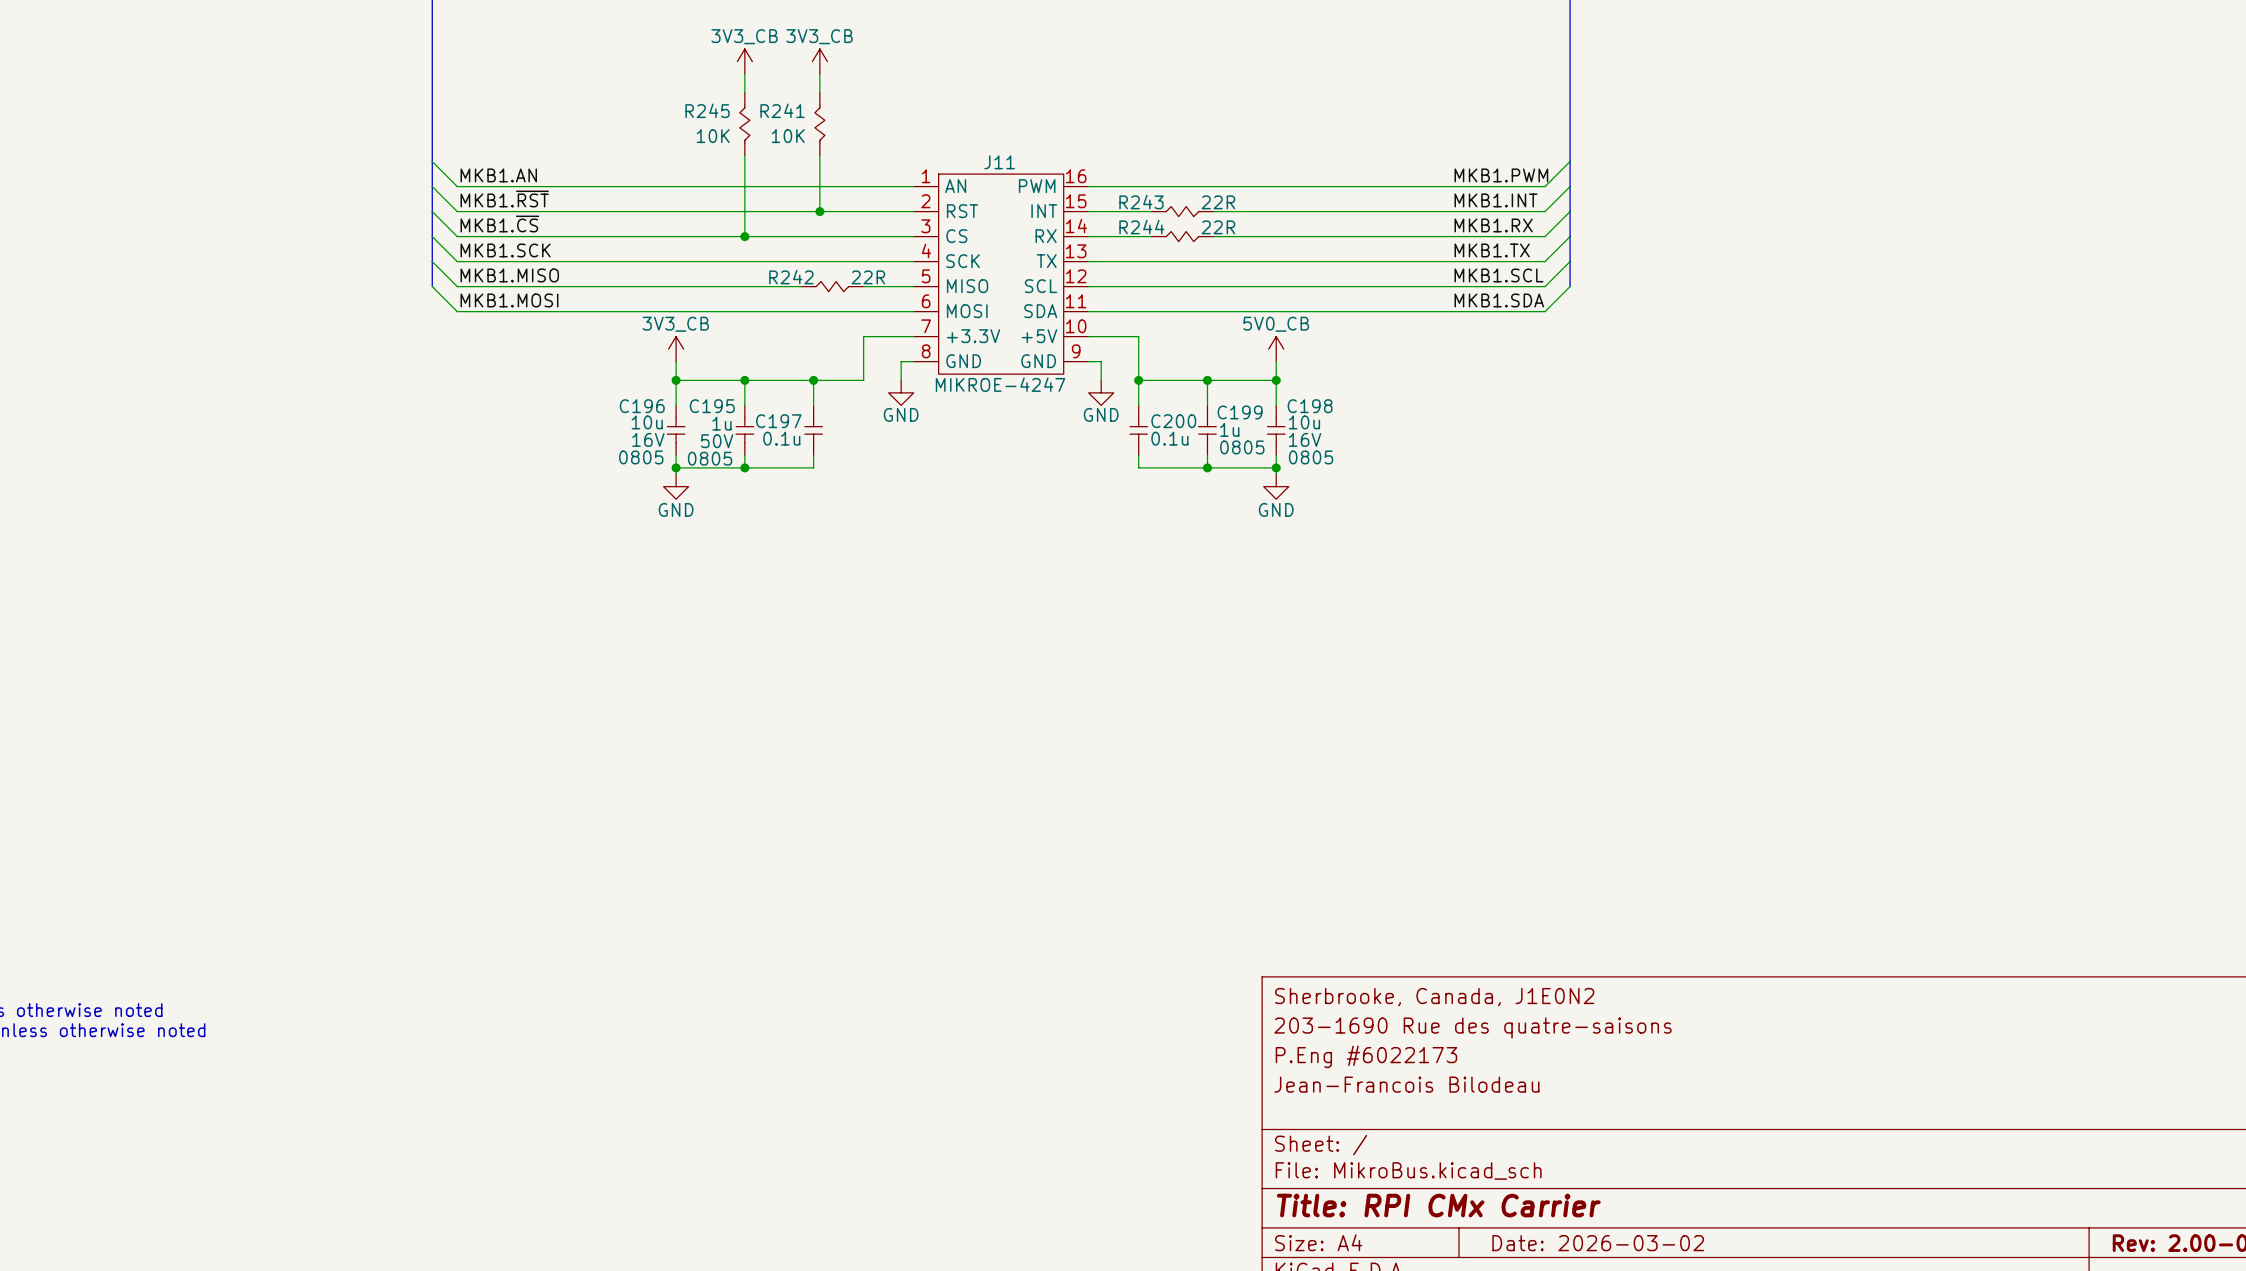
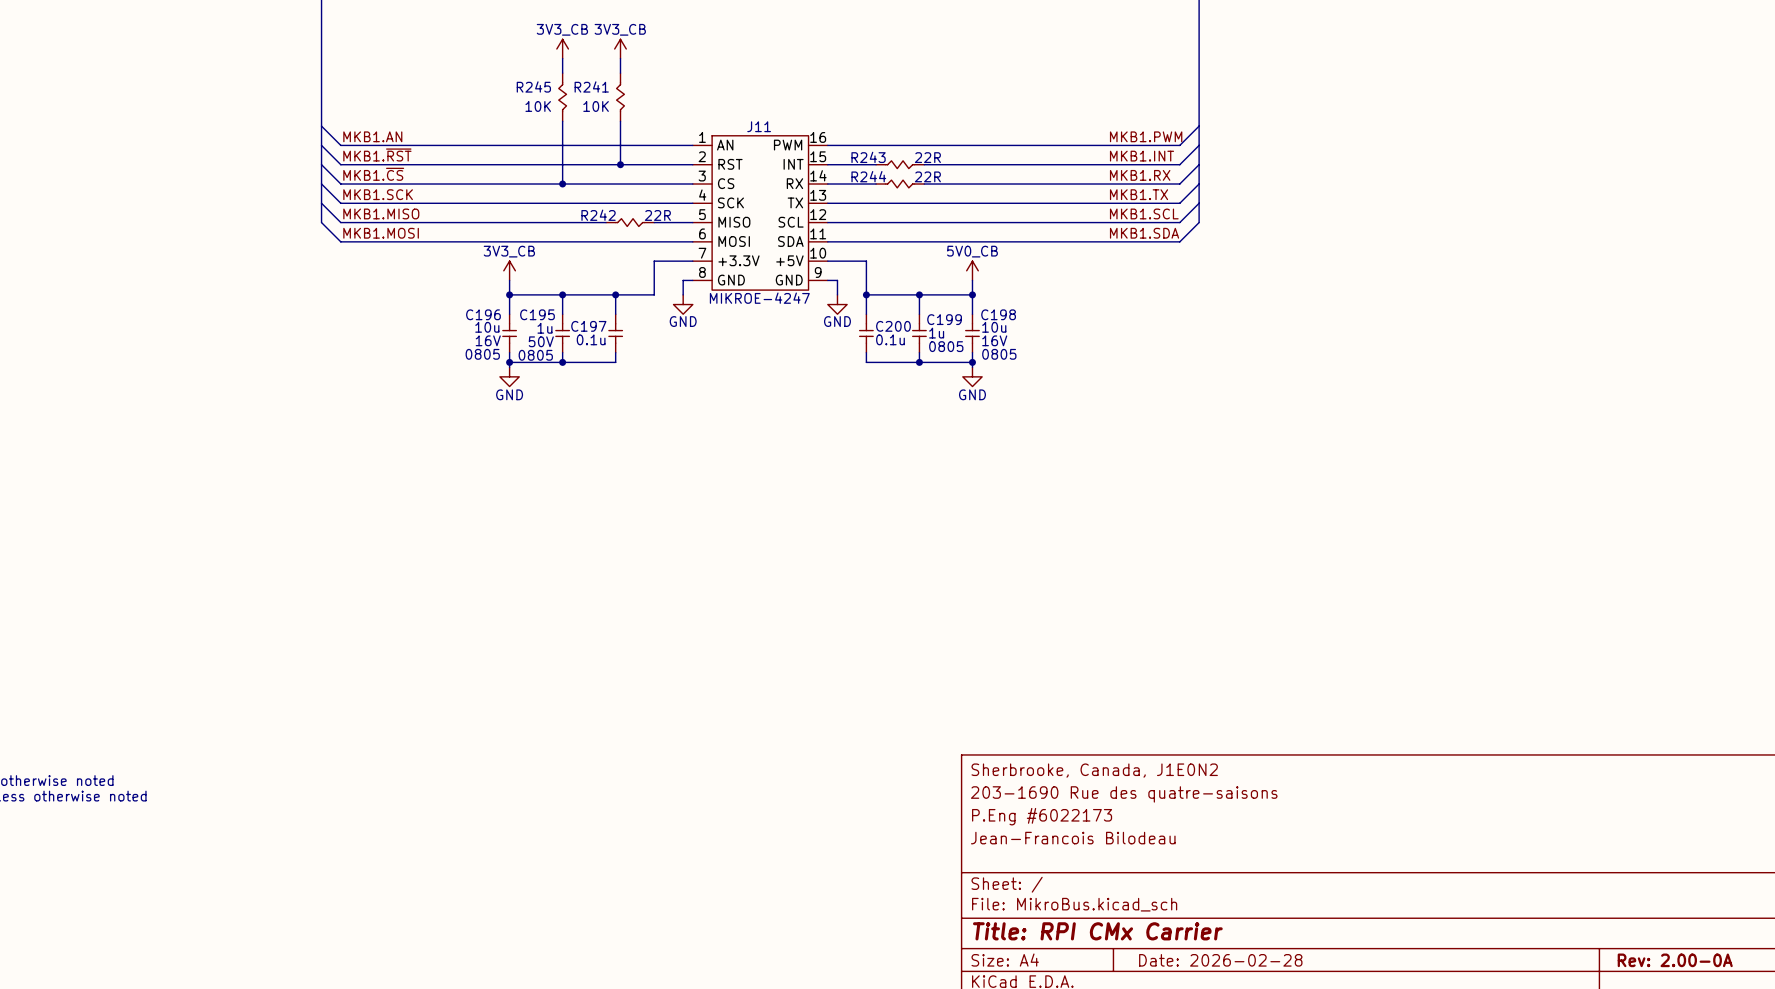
title block: Date: 2026-03-02 (1598, 1243) -> Date: 2026-02-28 (1220, 960)

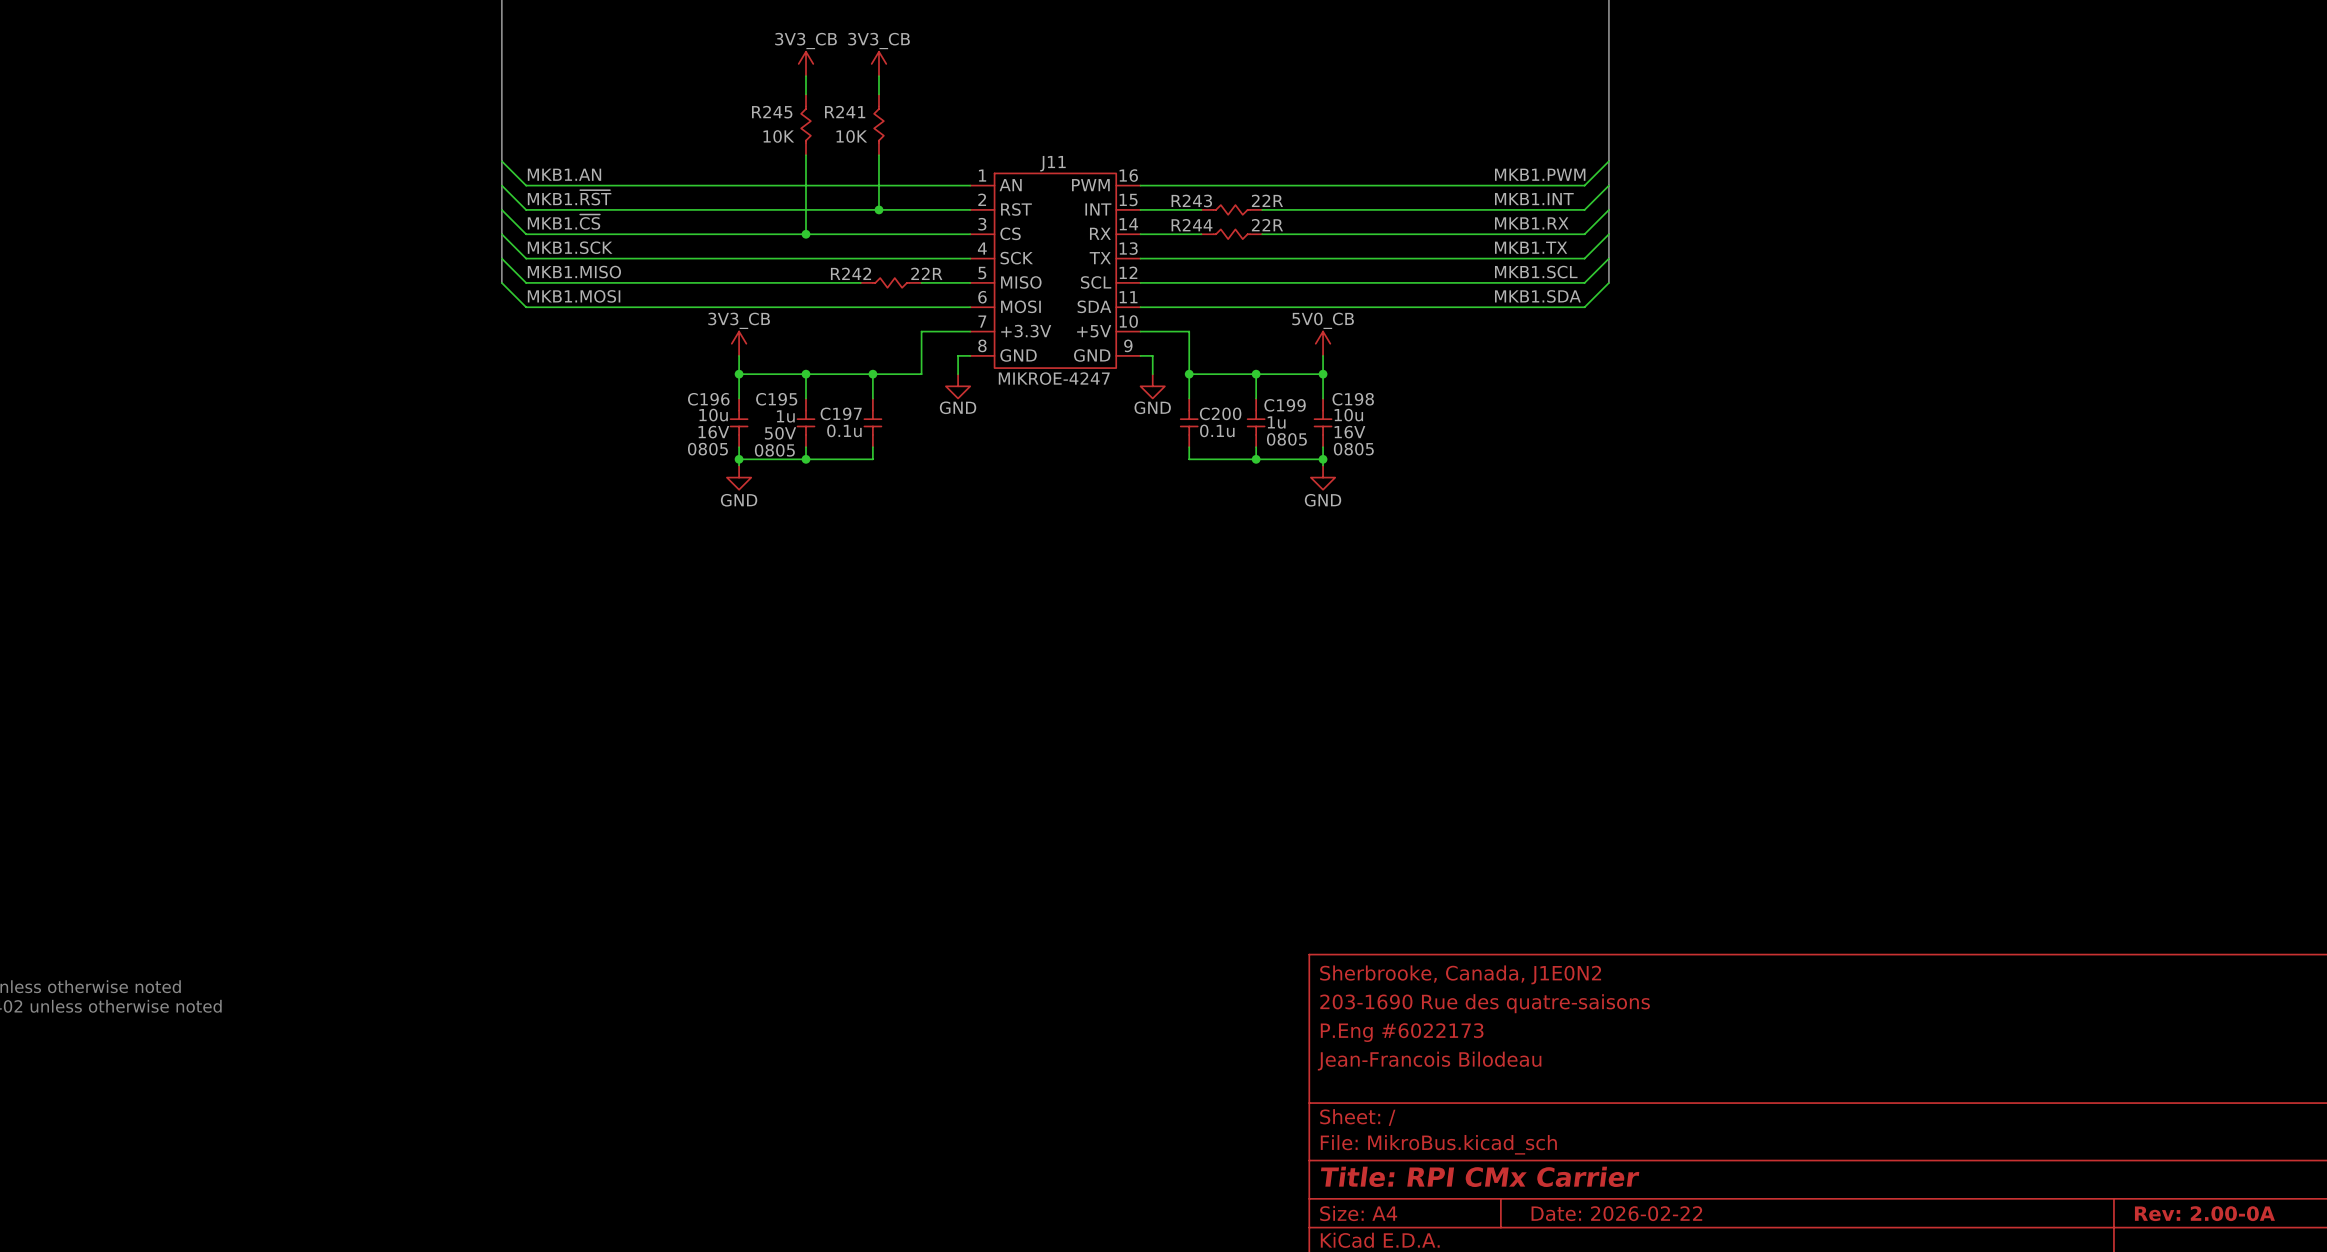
title block: Date: 2026-02-28 (1220, 960) -> Date: 2026-02-22 (1616, 1213)

